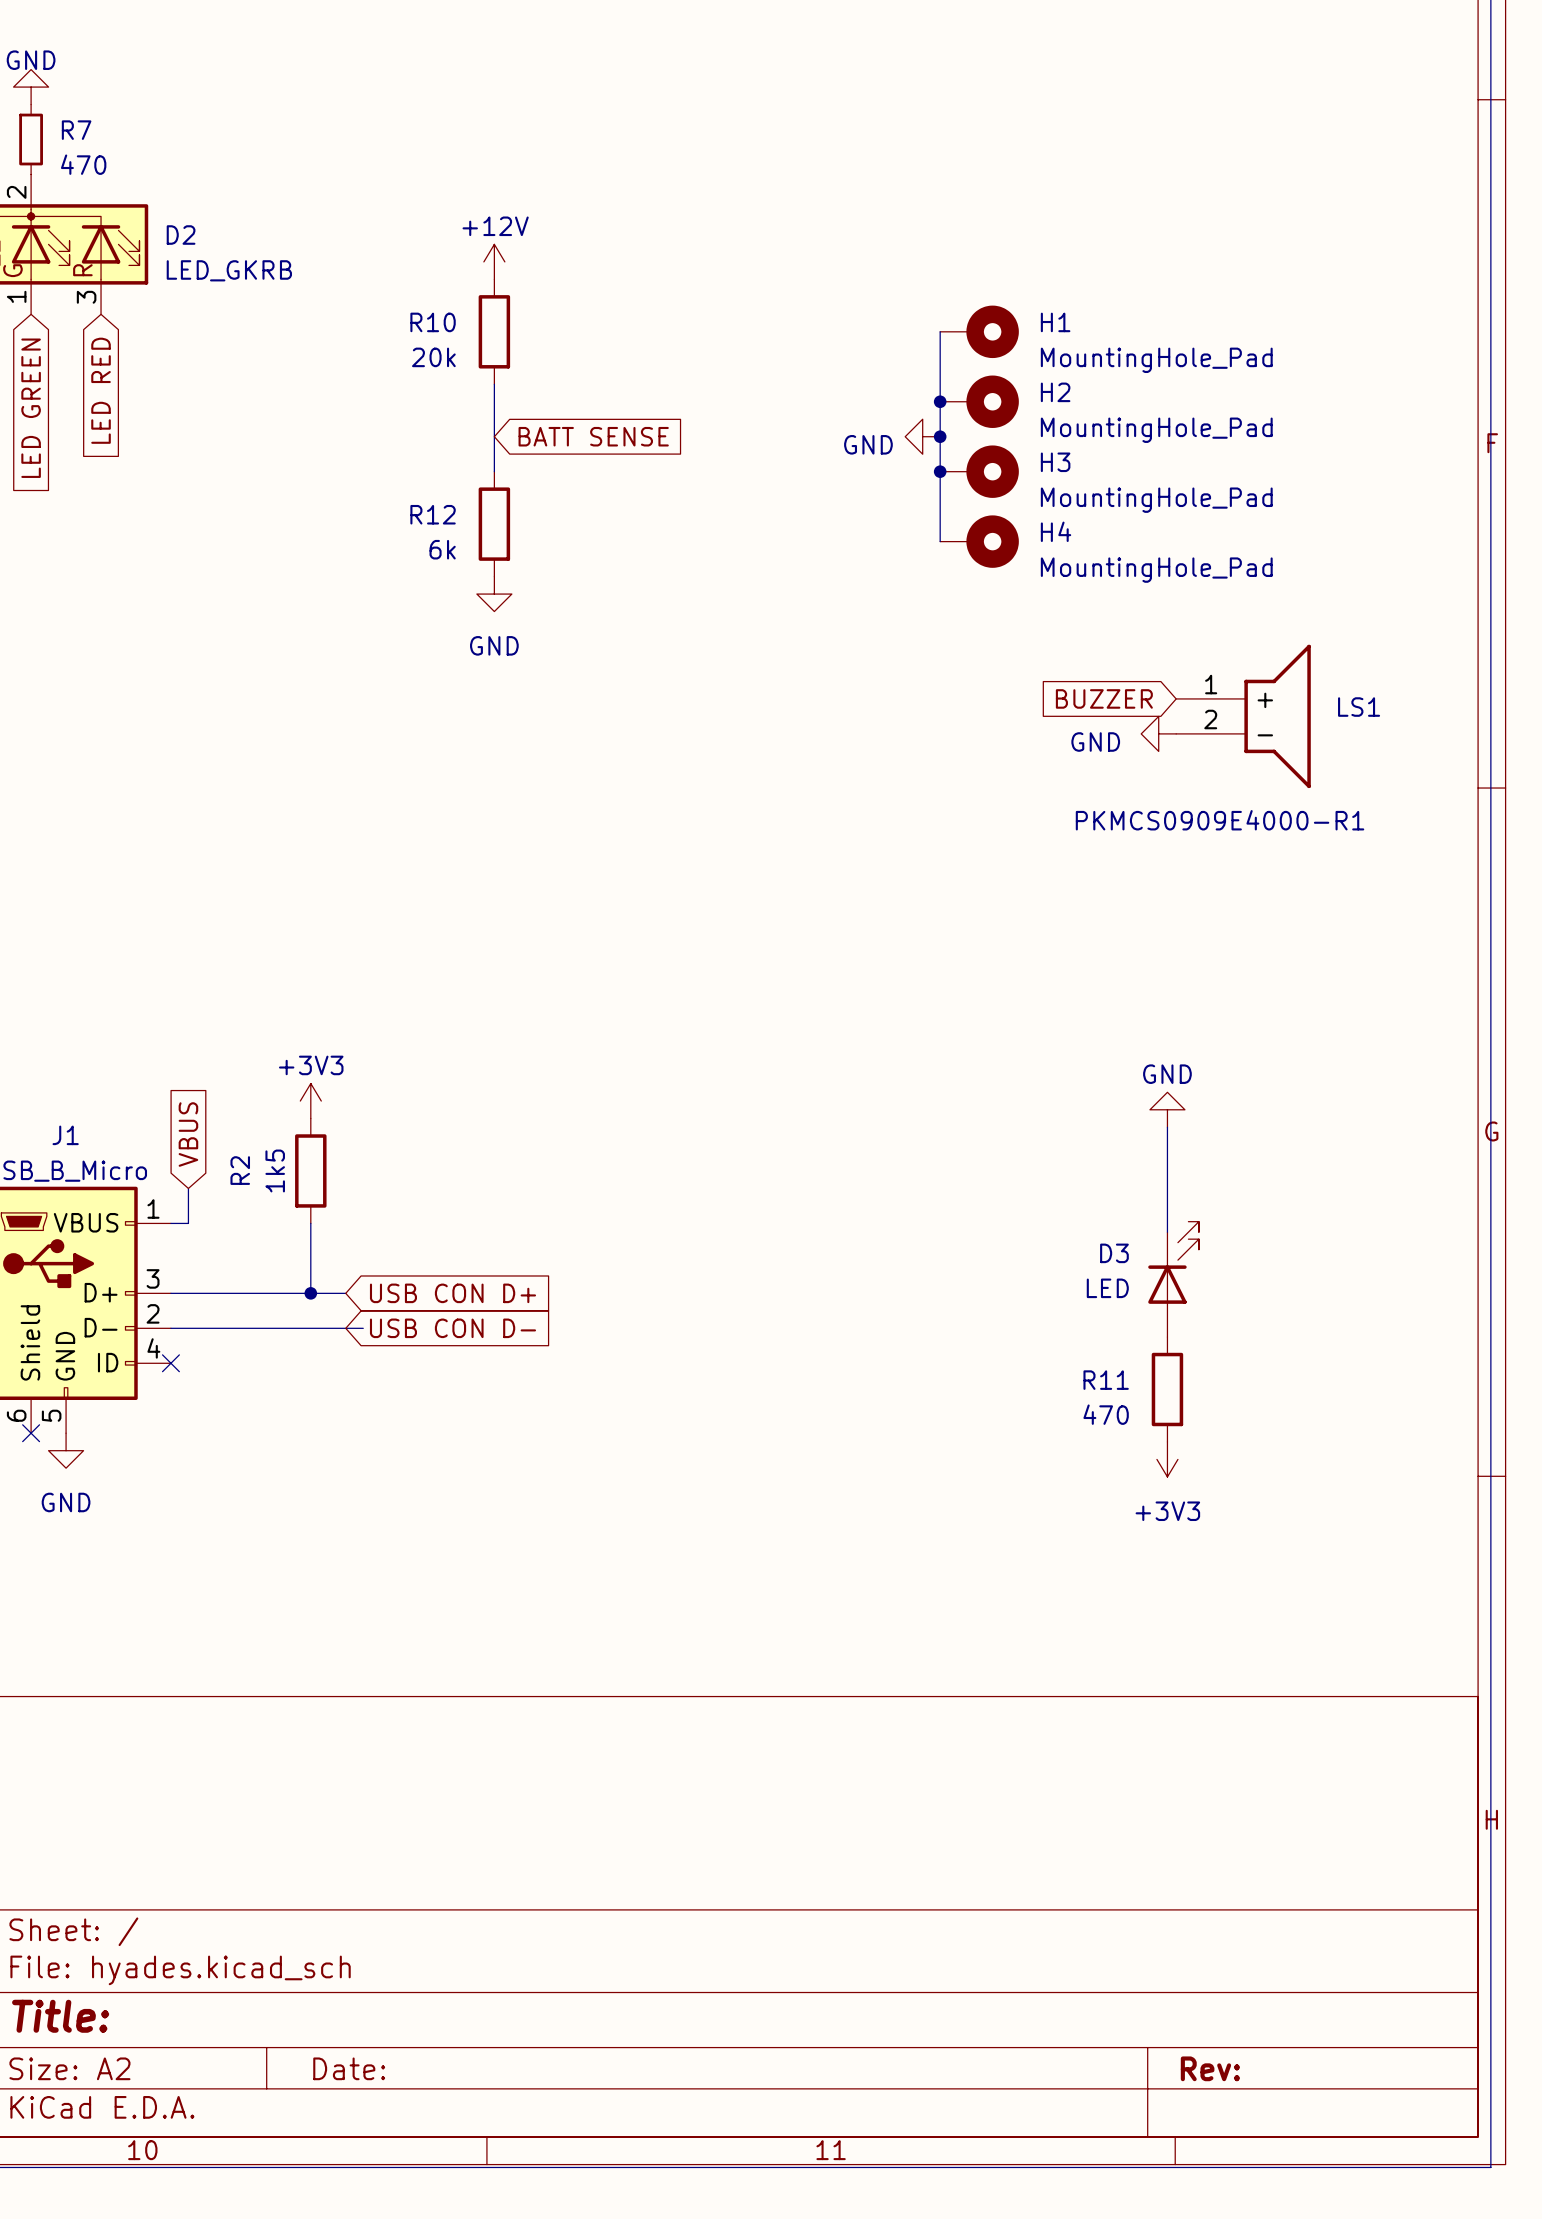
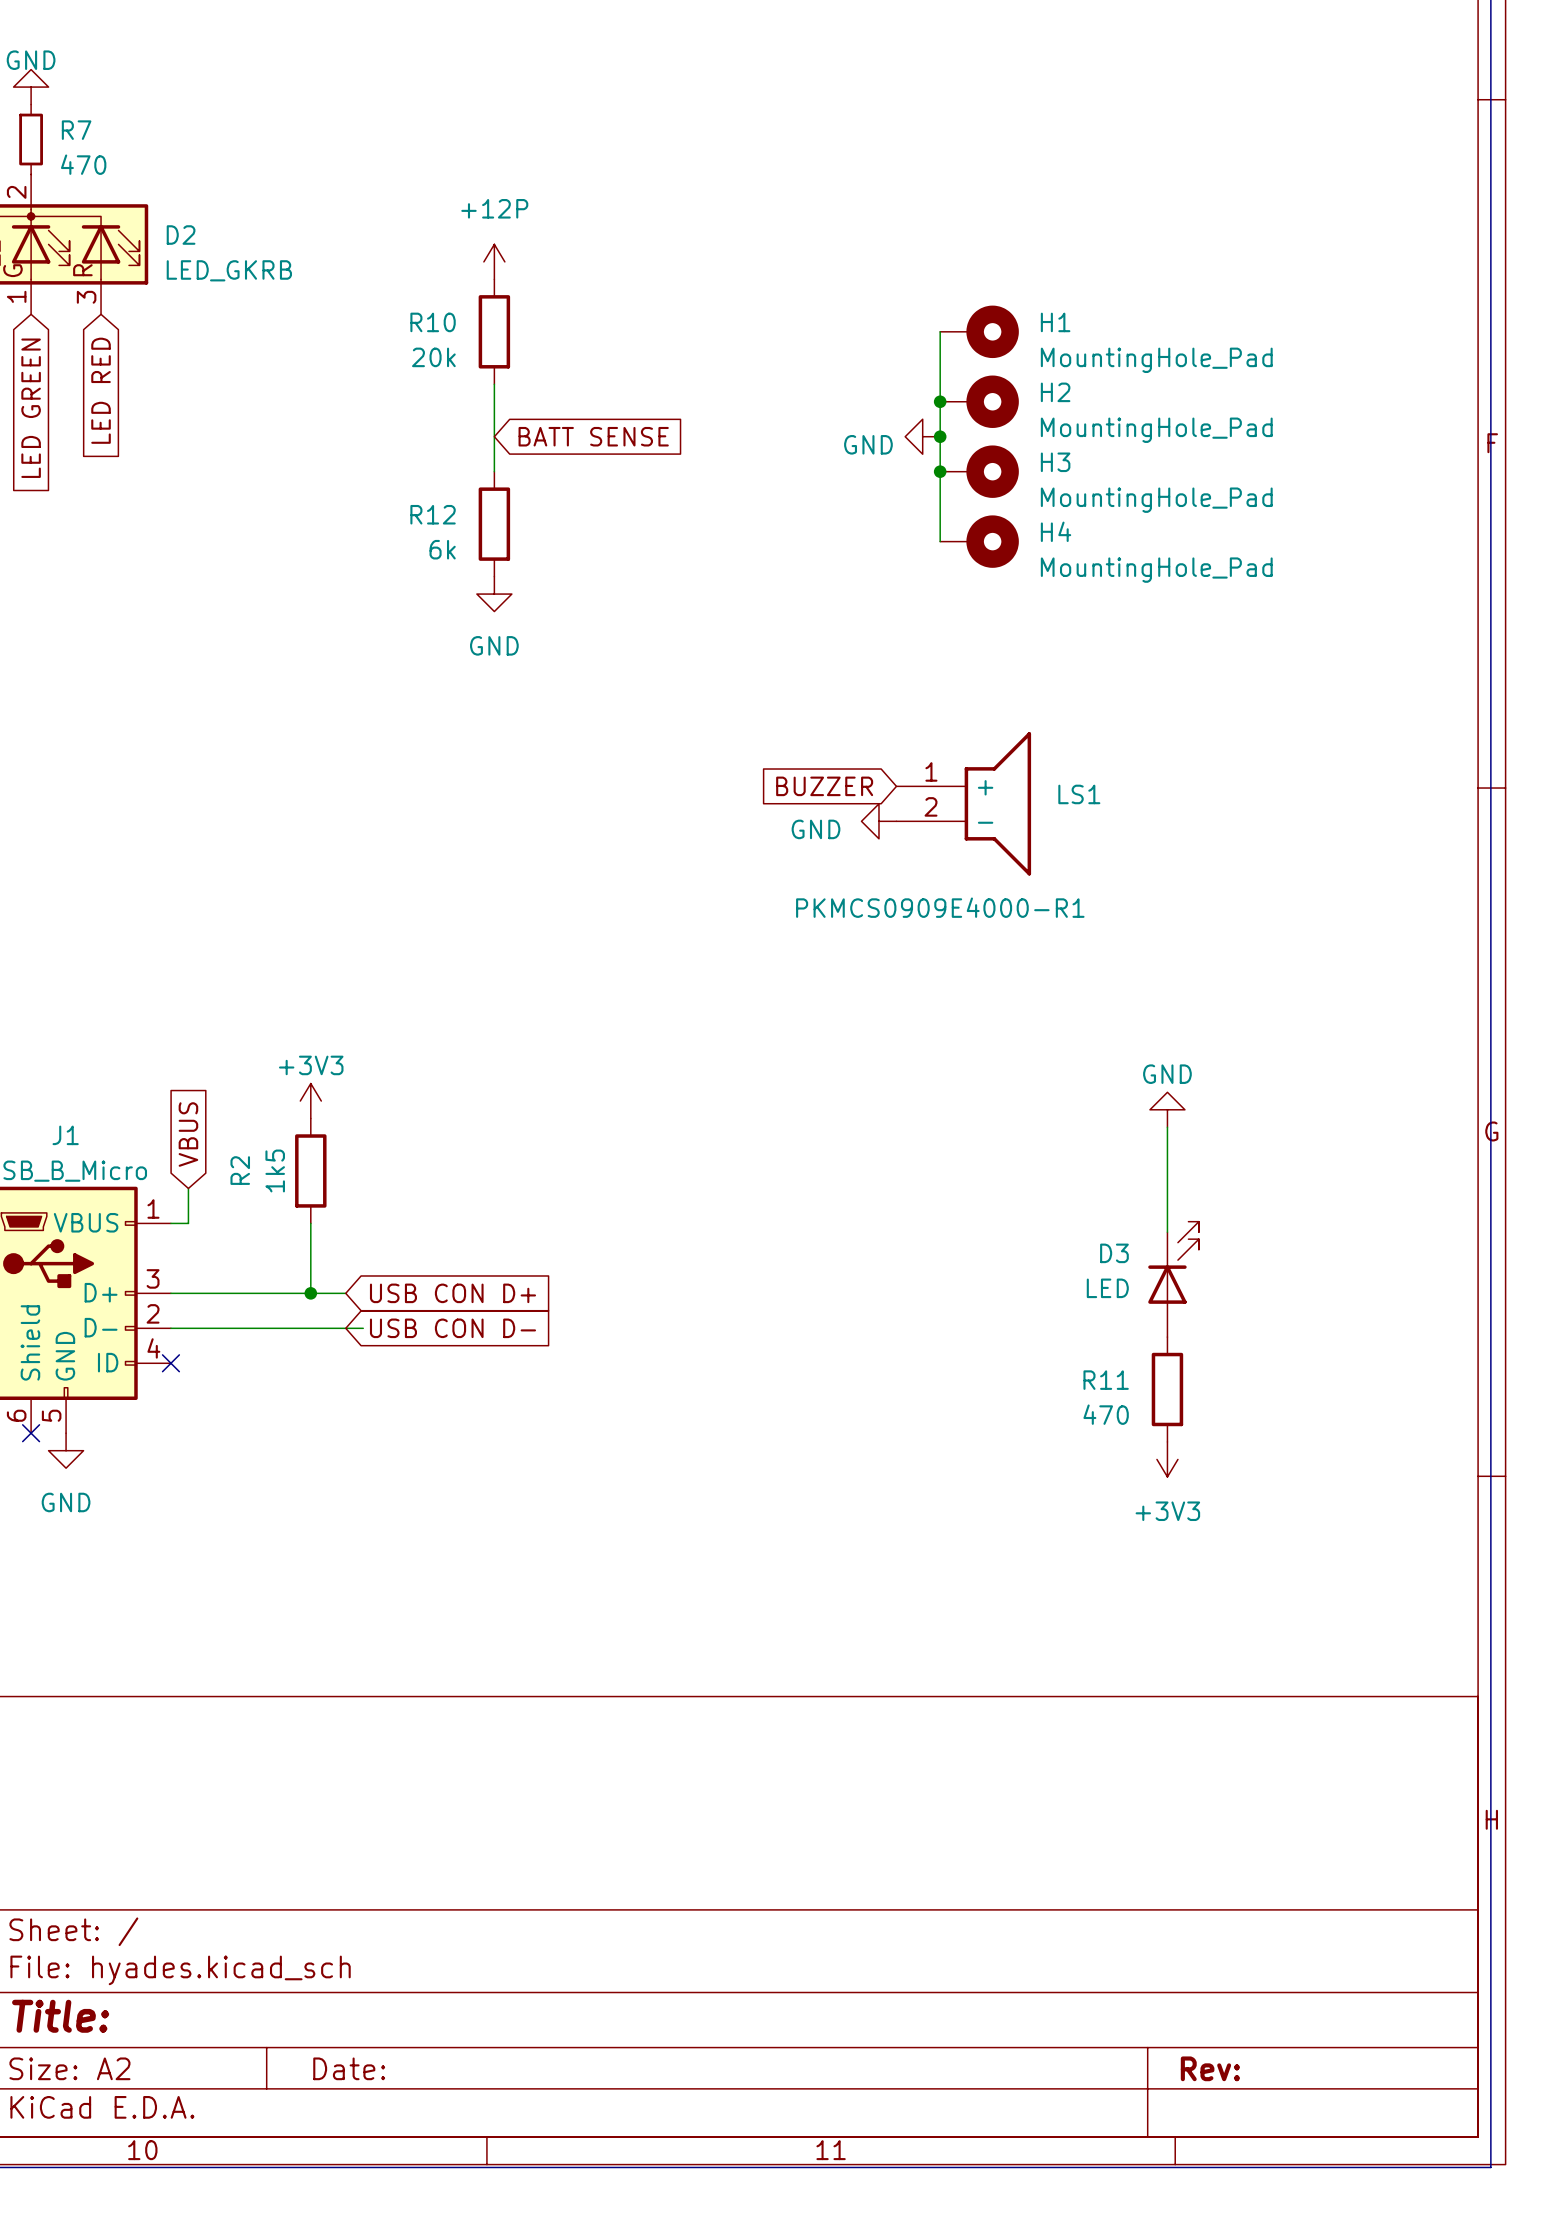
power symbol: +12V (494, 261) -> +12P (494, 261)
global label position: BUZZER (1104, 698) -> BUZZER (824, 786)
LS1 position: (1243, 716) -> (963, 803)
power symbol position: GND (1158, 733) -> GND (878, 821)

